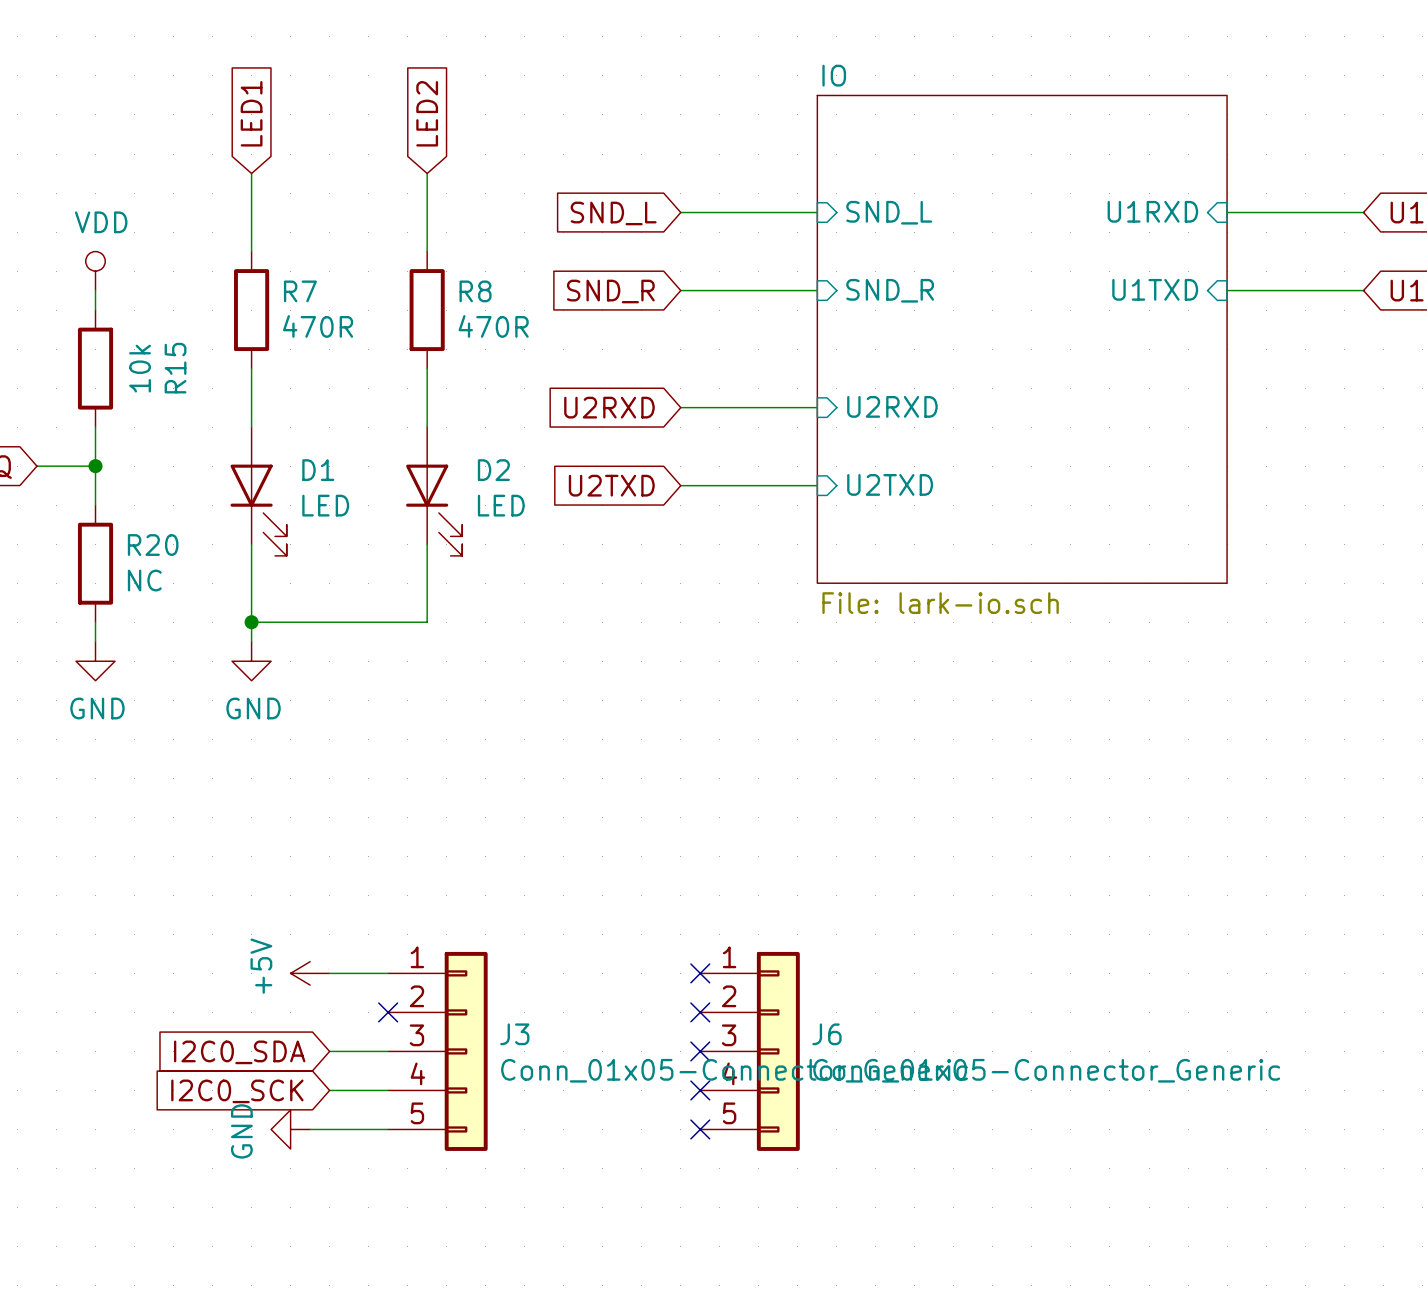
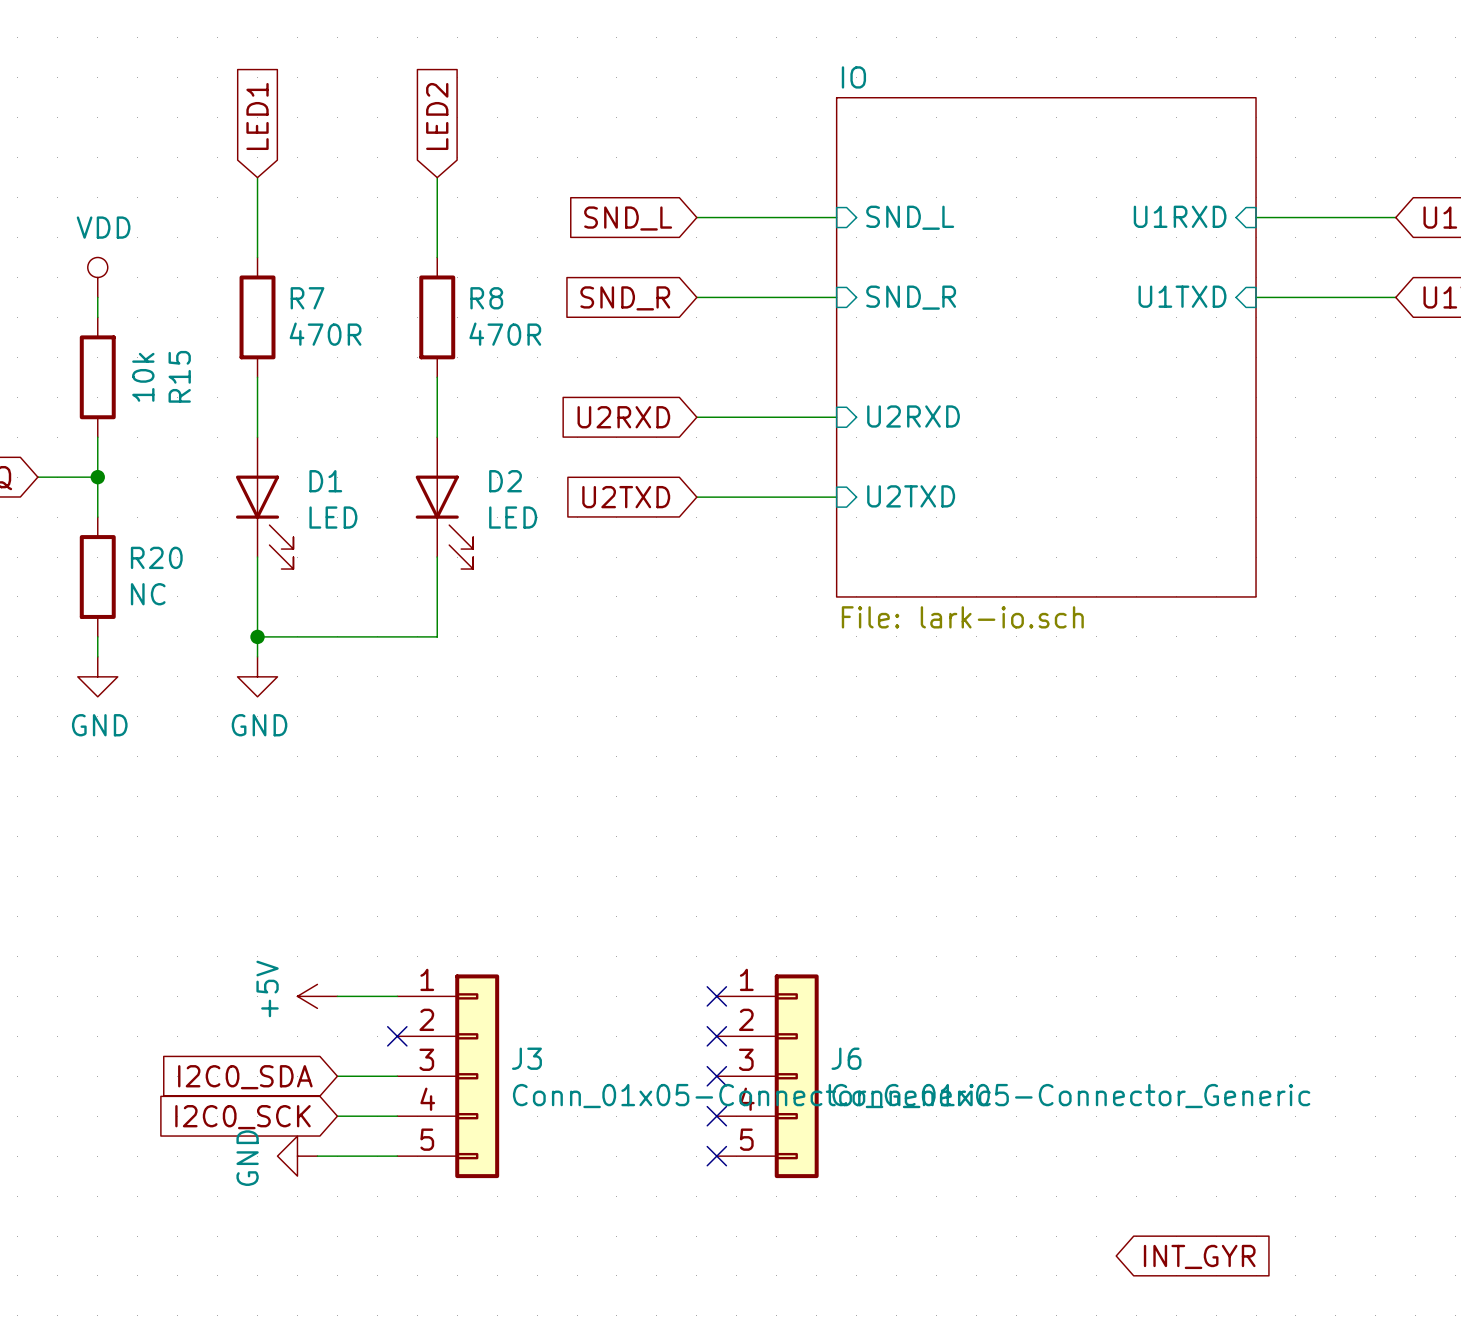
global label: none -> INT_GYR (1199, 1256)

